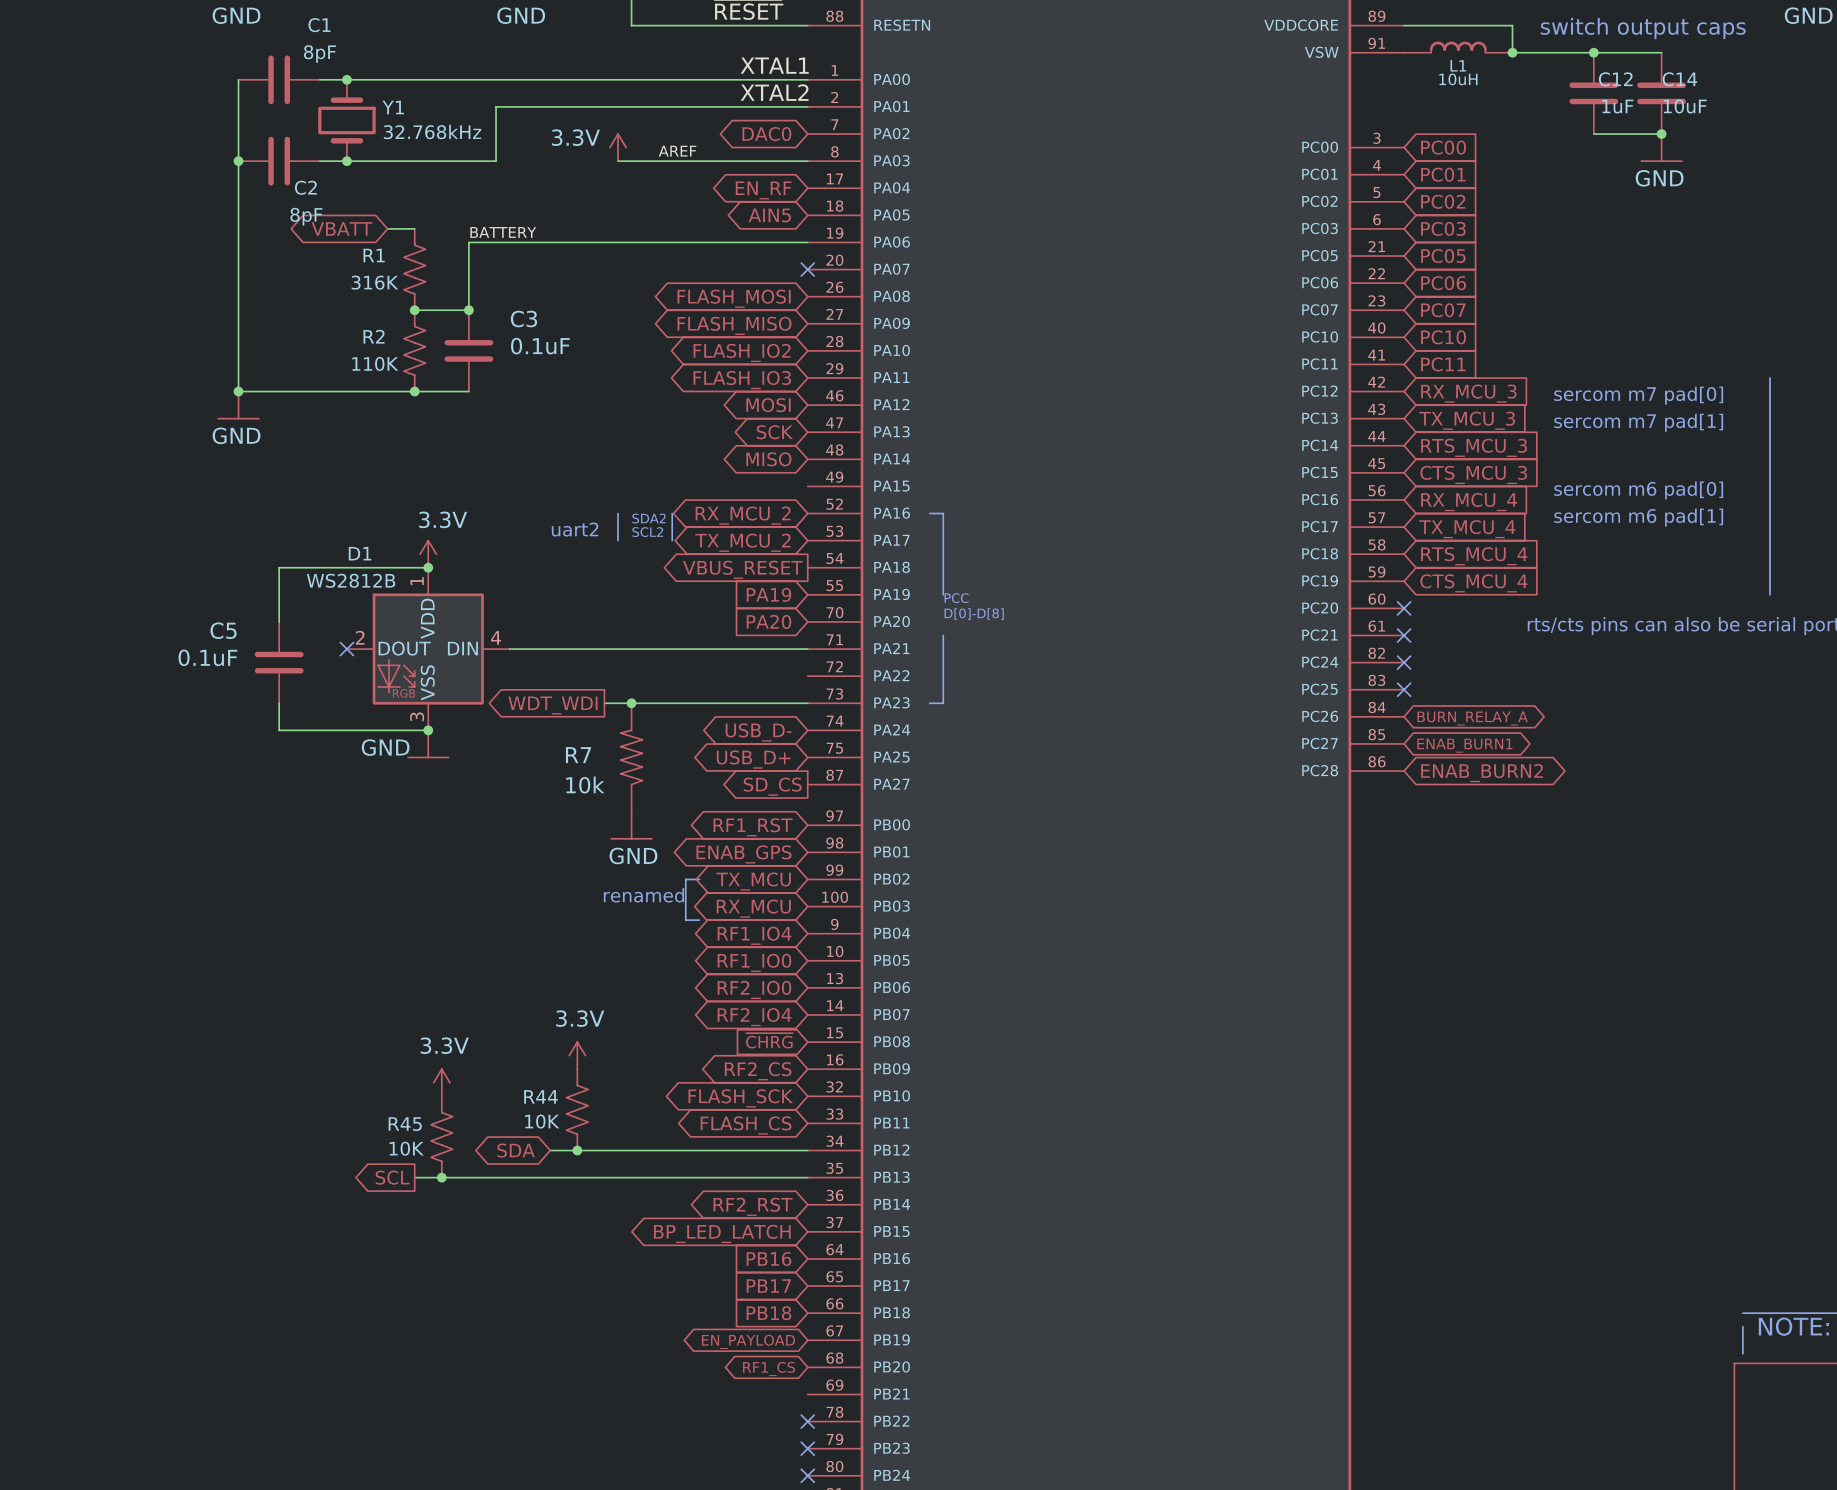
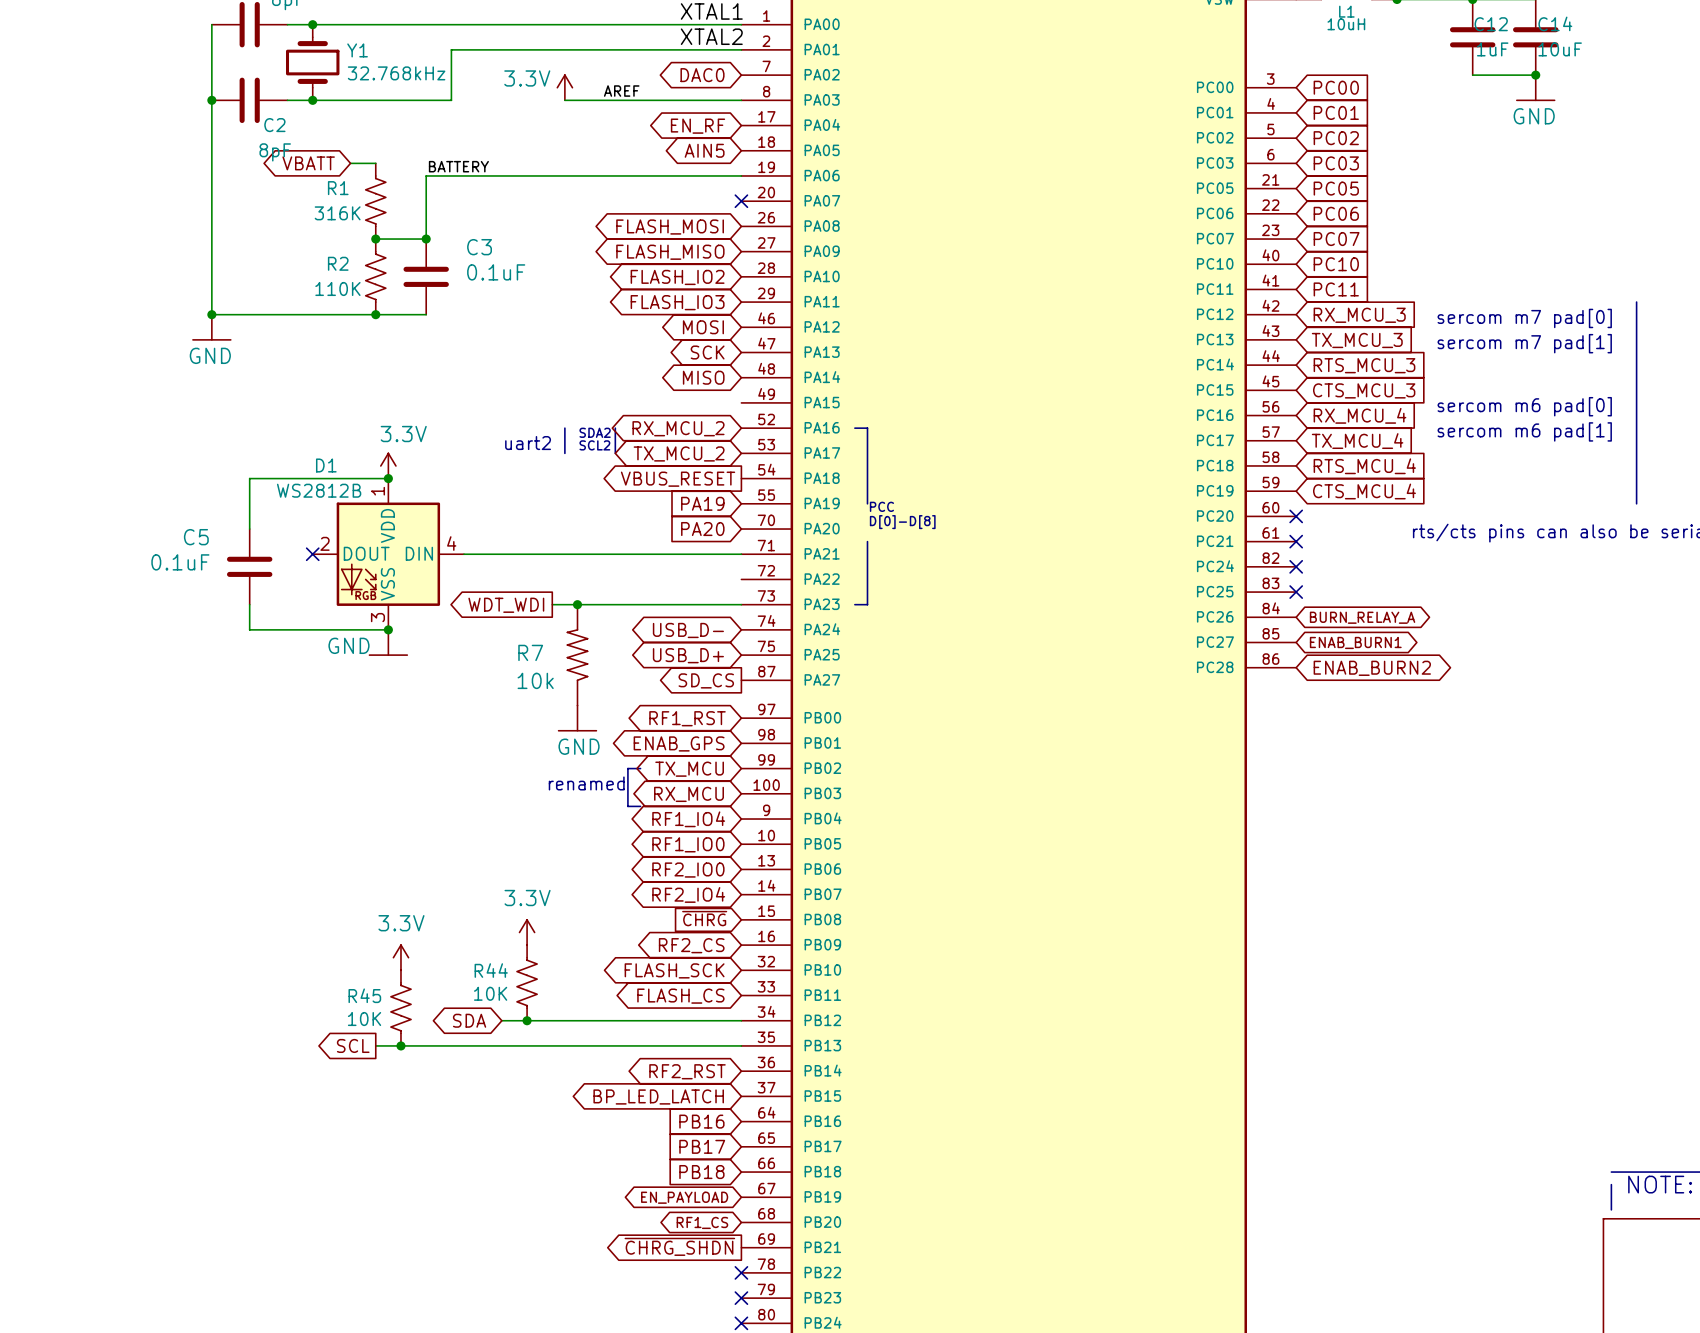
global label: none -> ~{CHRG_SHDN} (679, 1246)

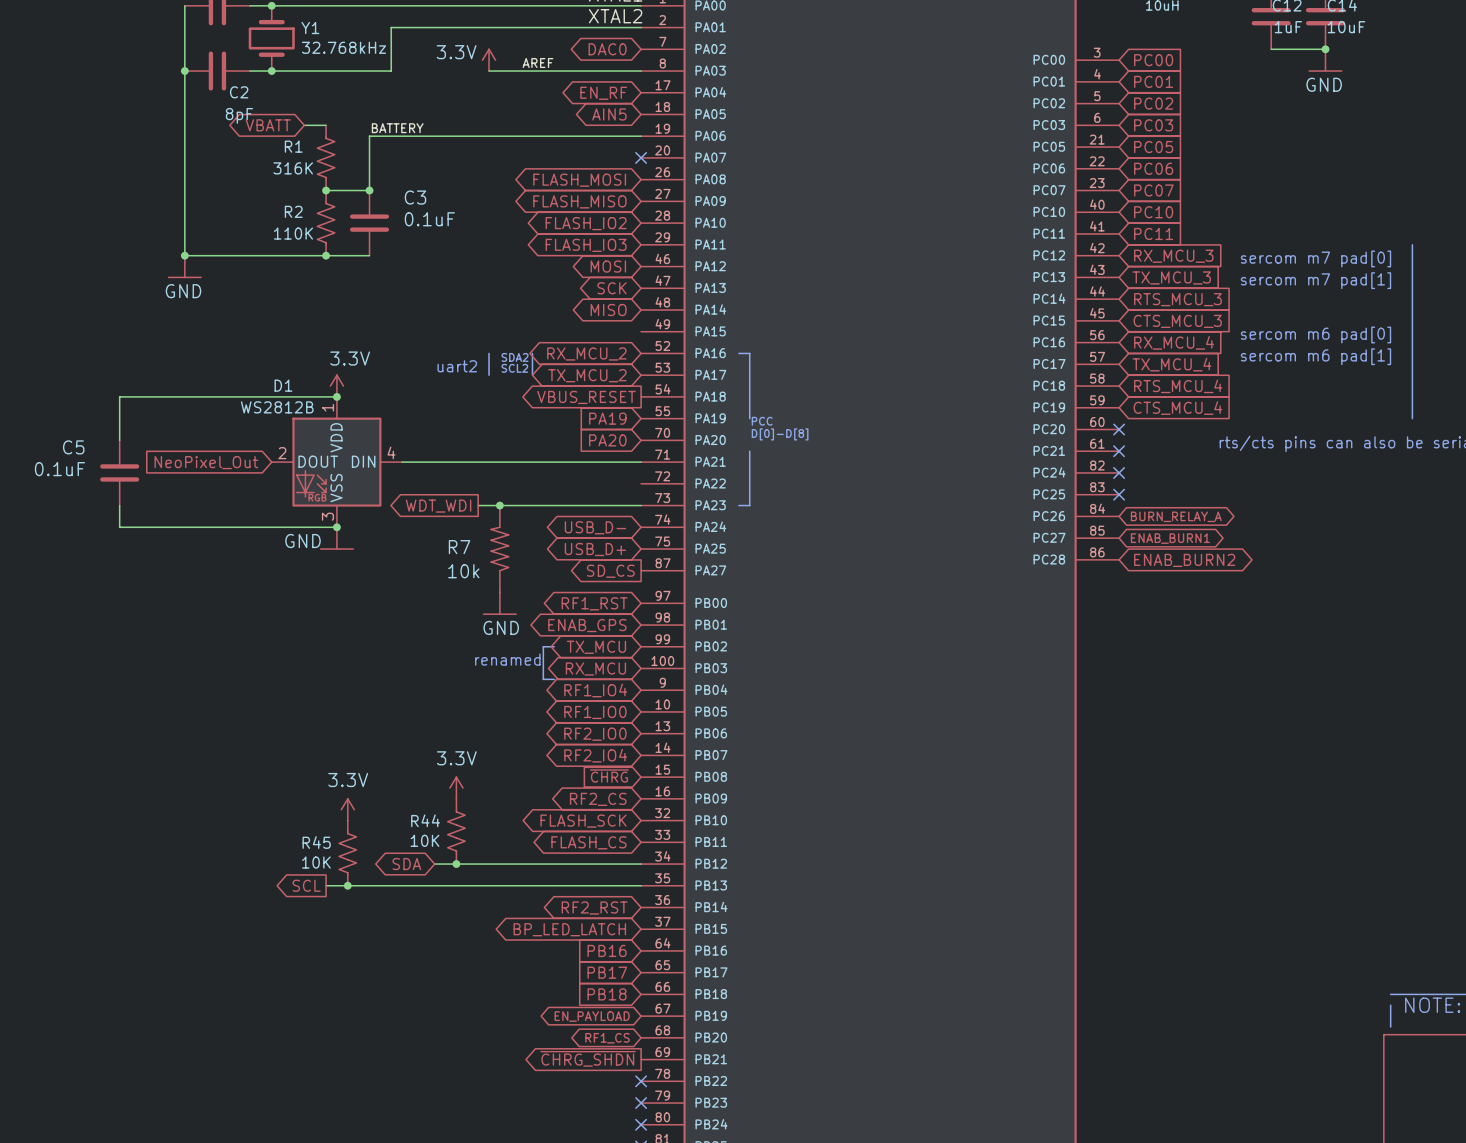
wire: (249, 478) (249, 529) -> (217, 396) (119, 396) (119, 440)
global label: none -> NeoPixel_Out (206, 462)
no-connect mark: (312, 554) -> none
C5 position: (249, 566) -> (119, 472)
wire: (249, 604) (249, 629) -> (119, 505) (119, 527) (217, 527)

